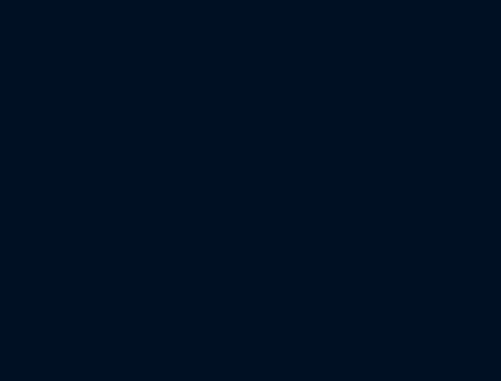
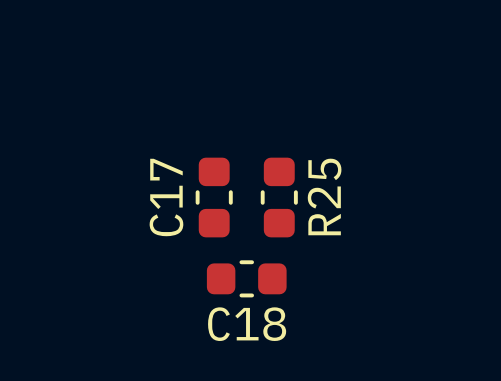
C17: none -> (214, 197)
R25: none -> (279, 197)
C18: none -> (246, 278)

